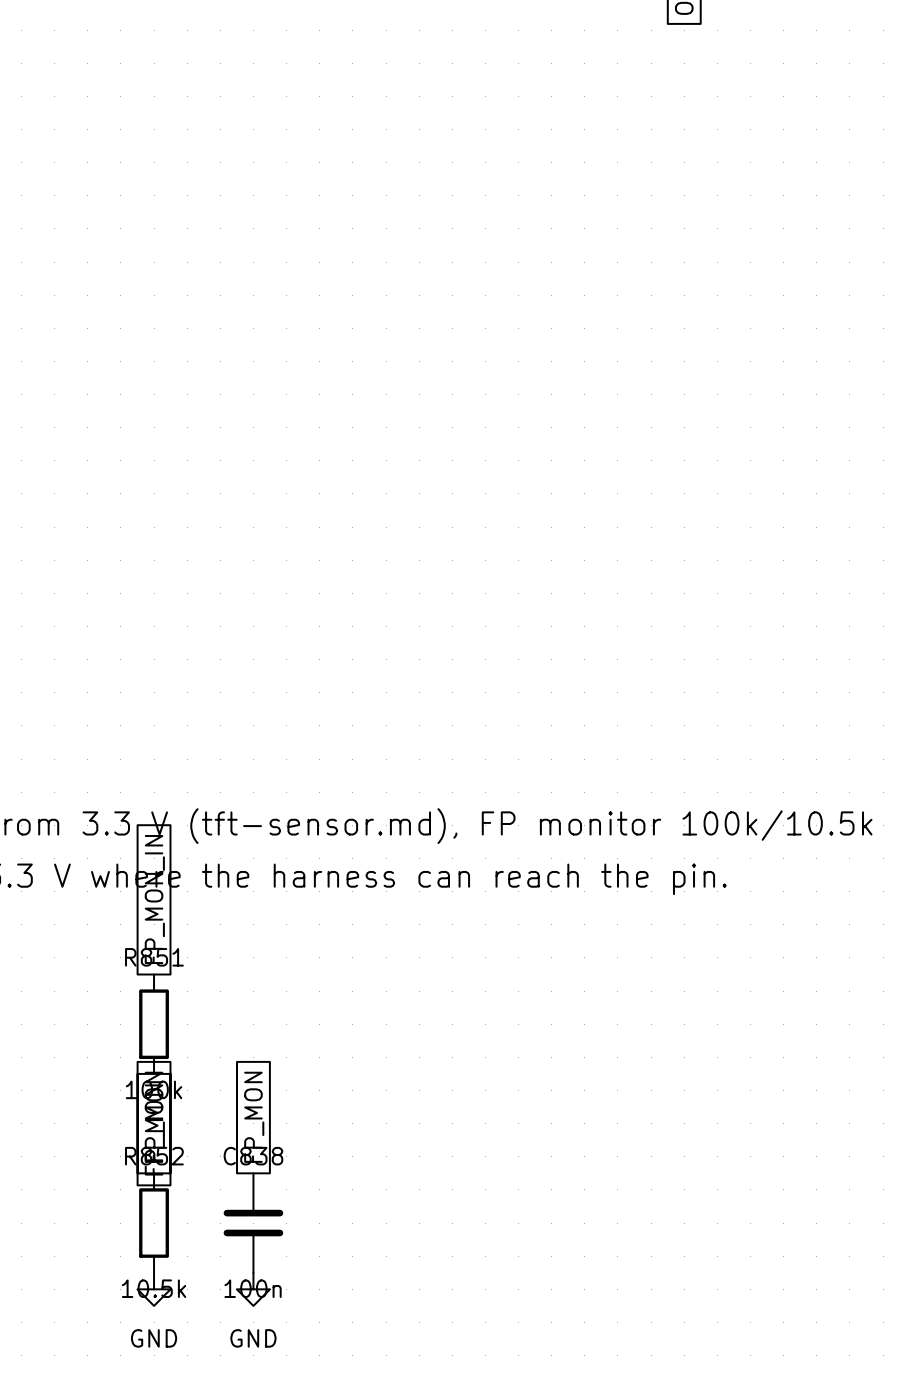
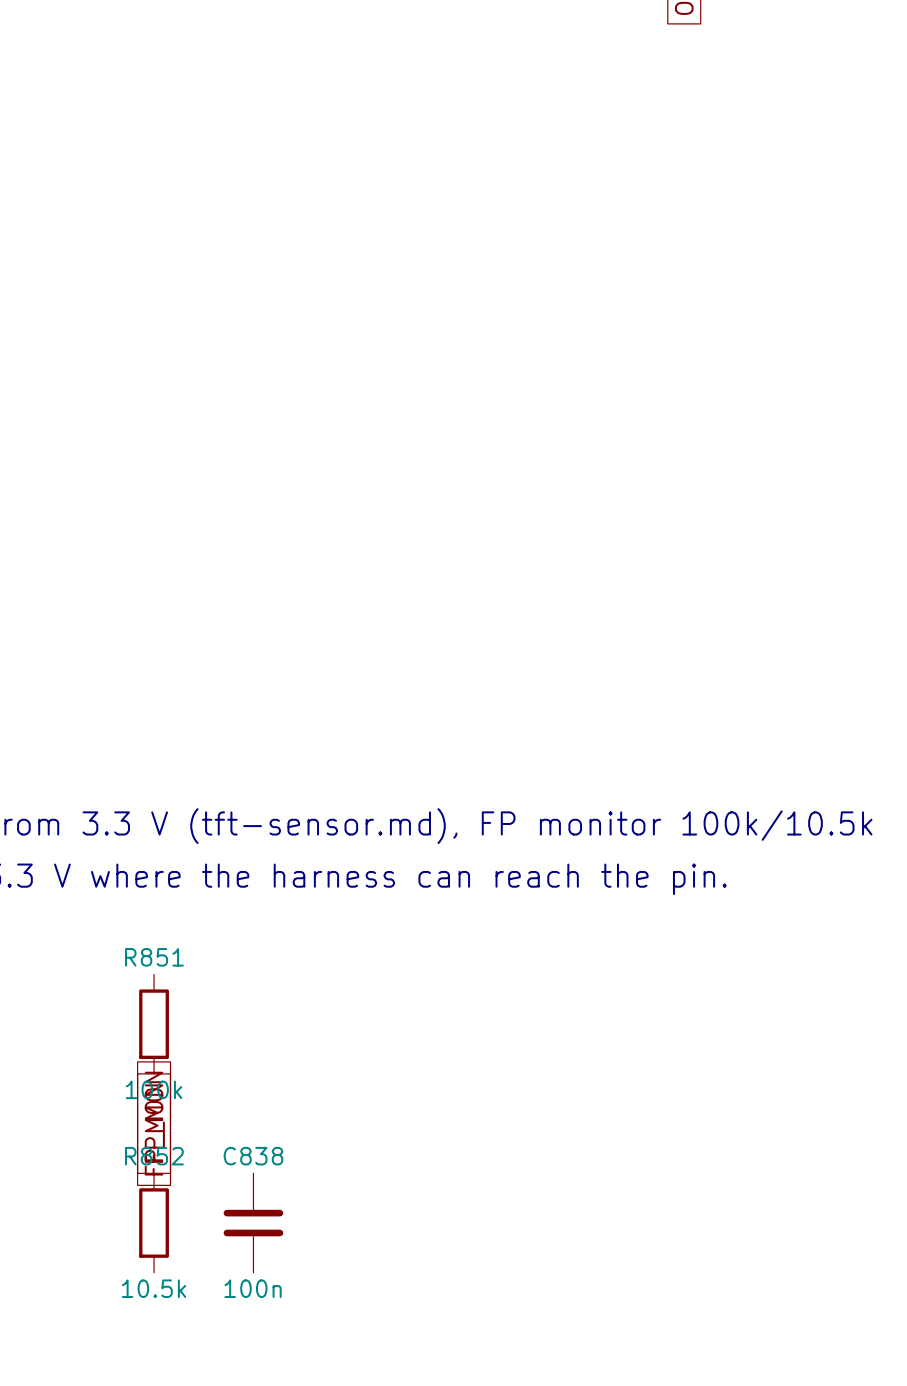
global label: FP_MON_IN (154, 899) -> none
global label: FP_MON (254, 1117) -> none
power symbol: GND (154, 1289) -> none
power symbol: GND (253, 1289) -> none

